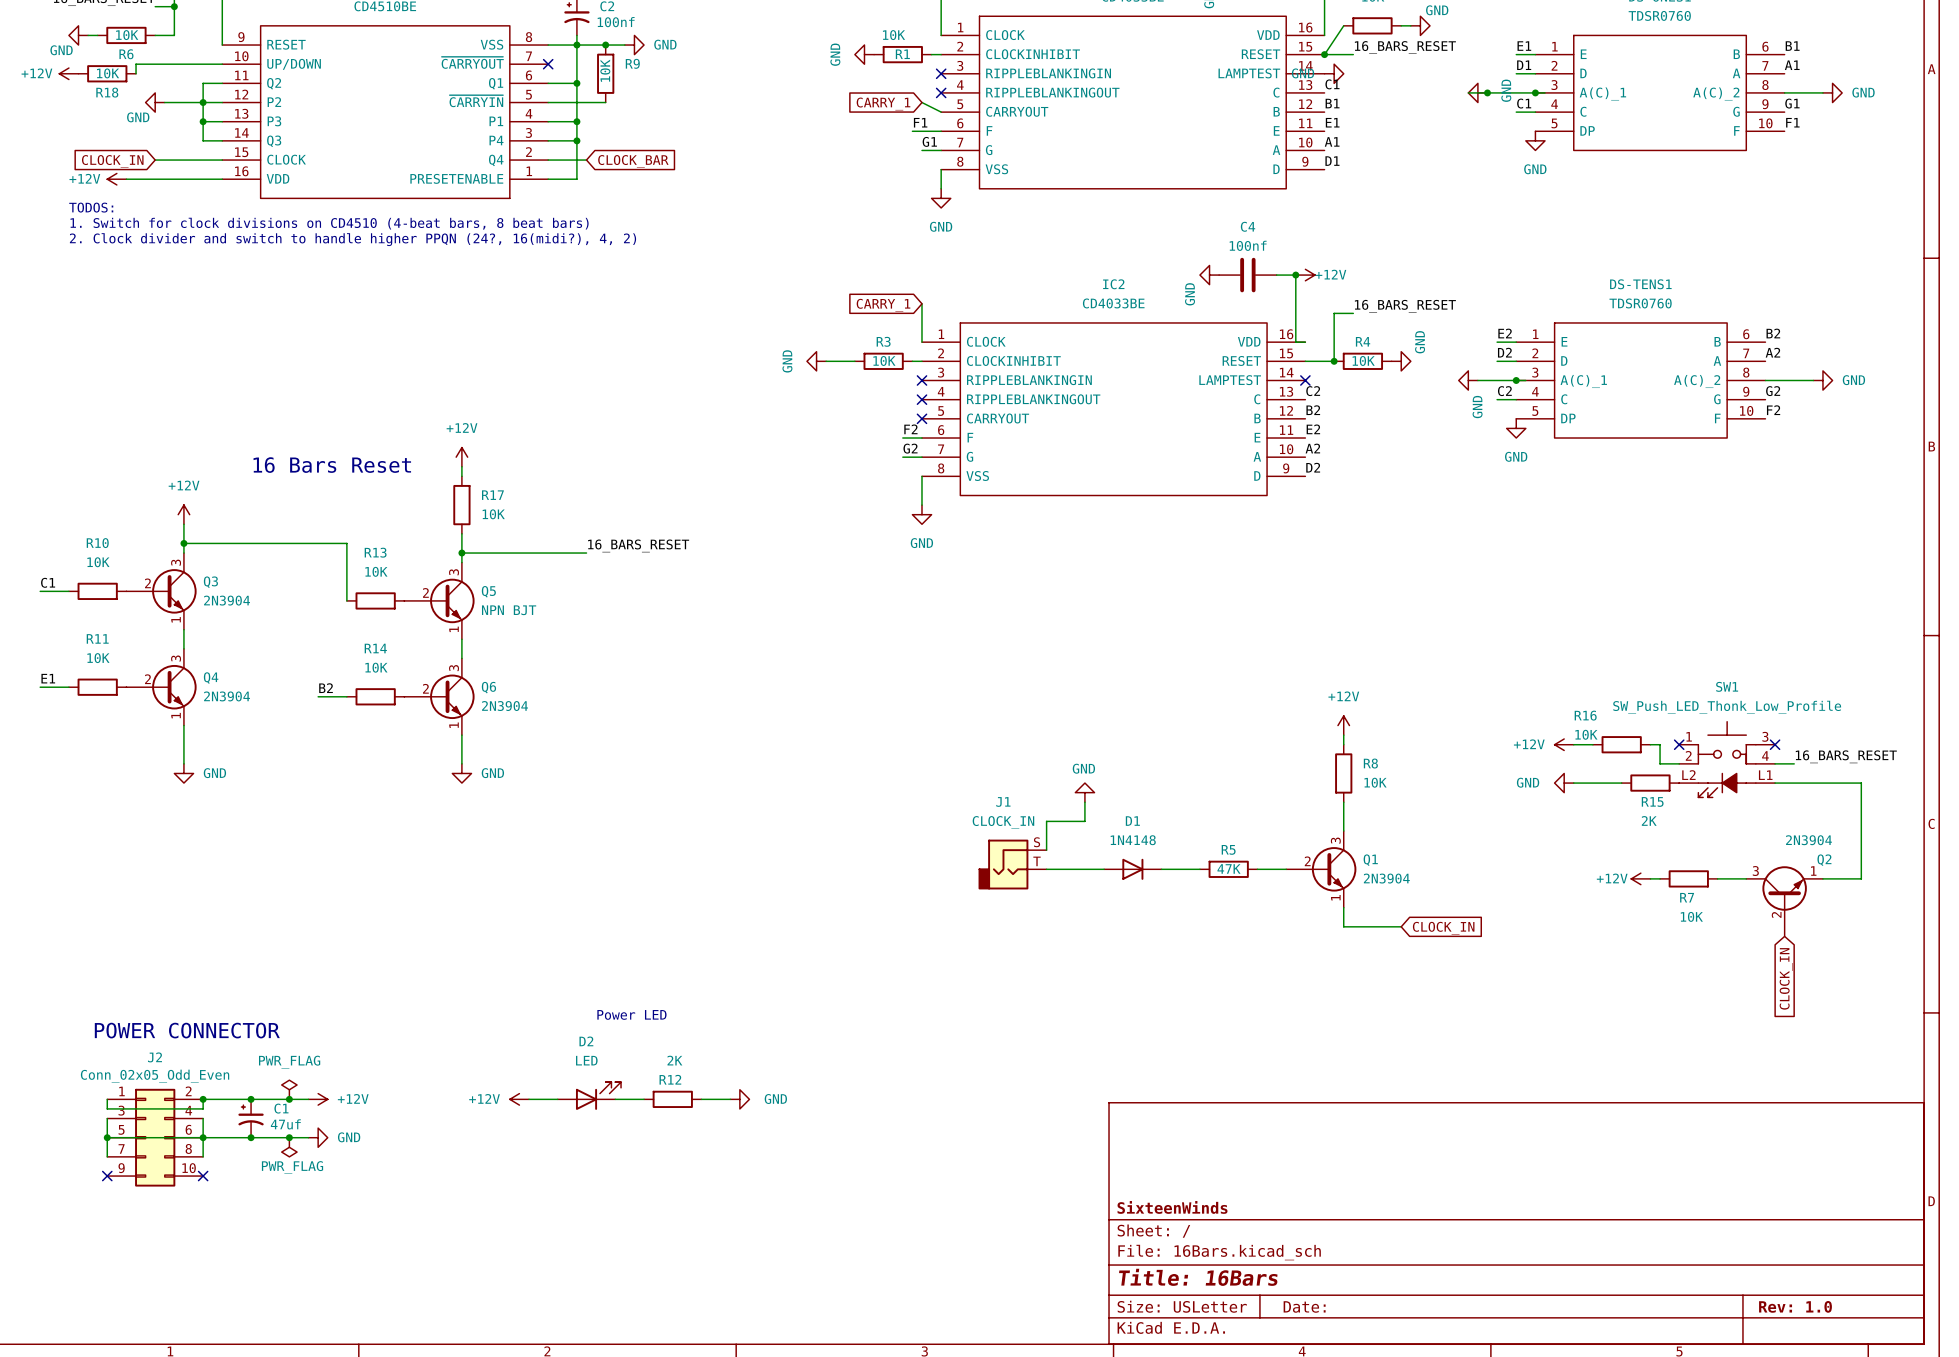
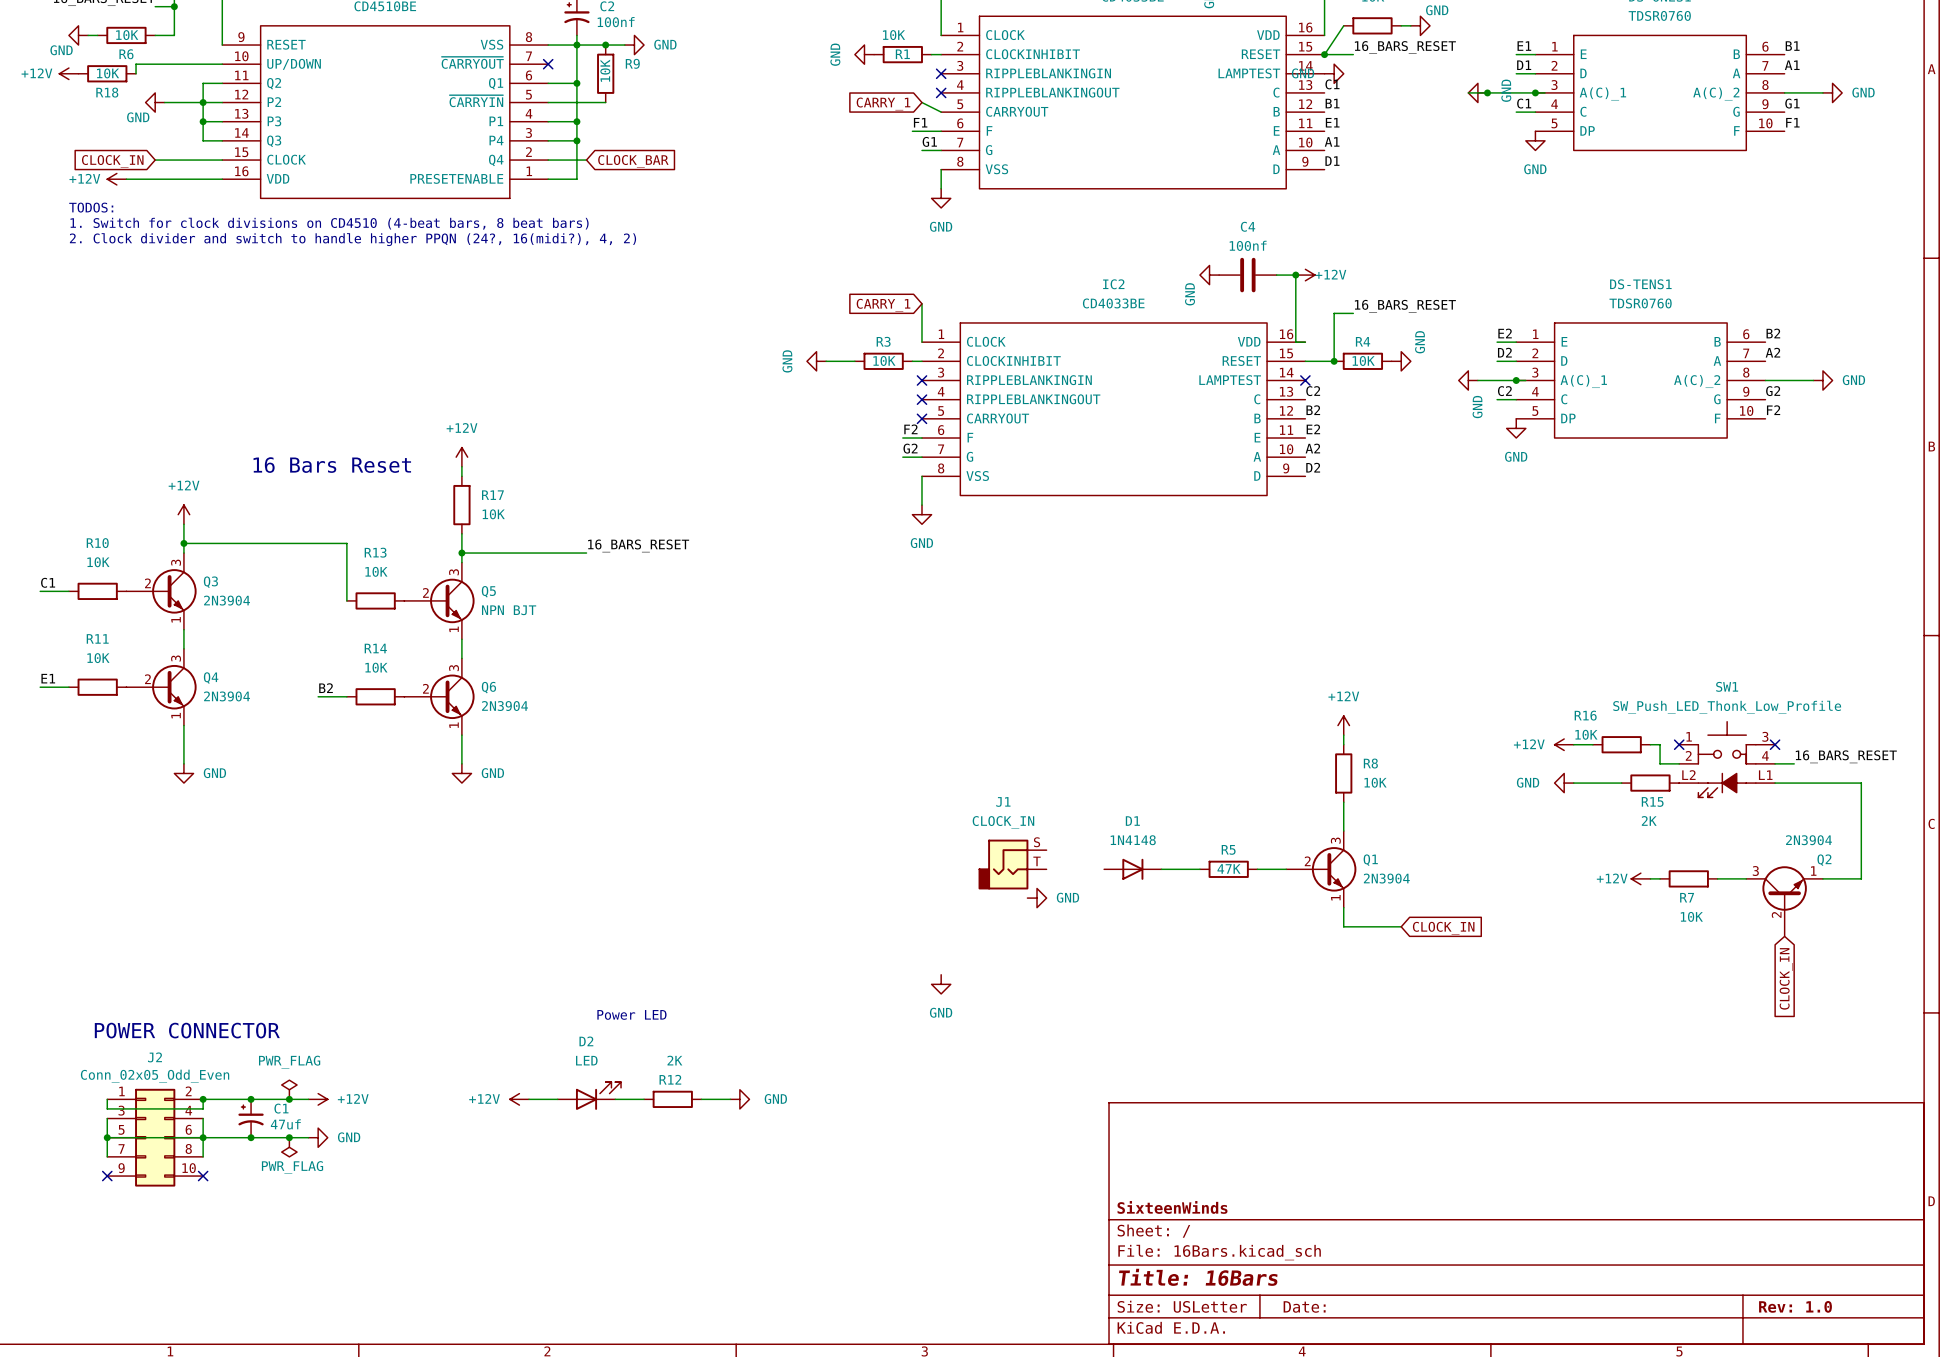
power symbol rotation: 0° (1084, 792) -> 90° clockwise (1037, 898)
power symbol position: GND (1084, 792) -> GND (1037, 898)
wire: (1084, 802) (1084, 821) (1046, 821) (1046, 850) -> none
wire: (1046, 869) (1104, 869) -> none
power symbol: none -> GND (941, 984)

